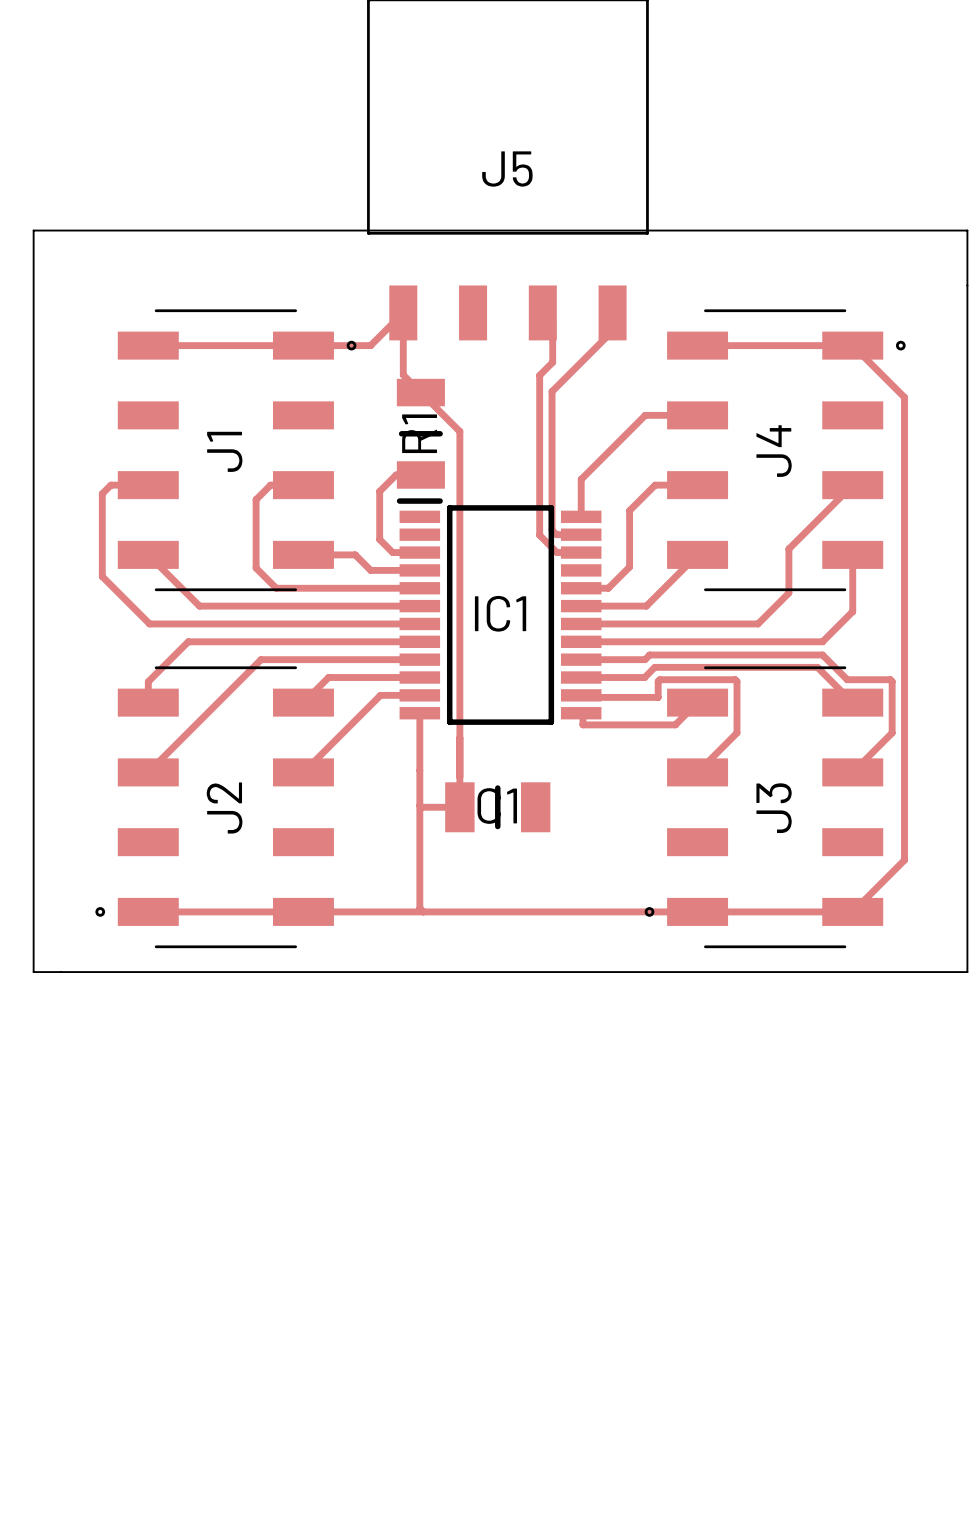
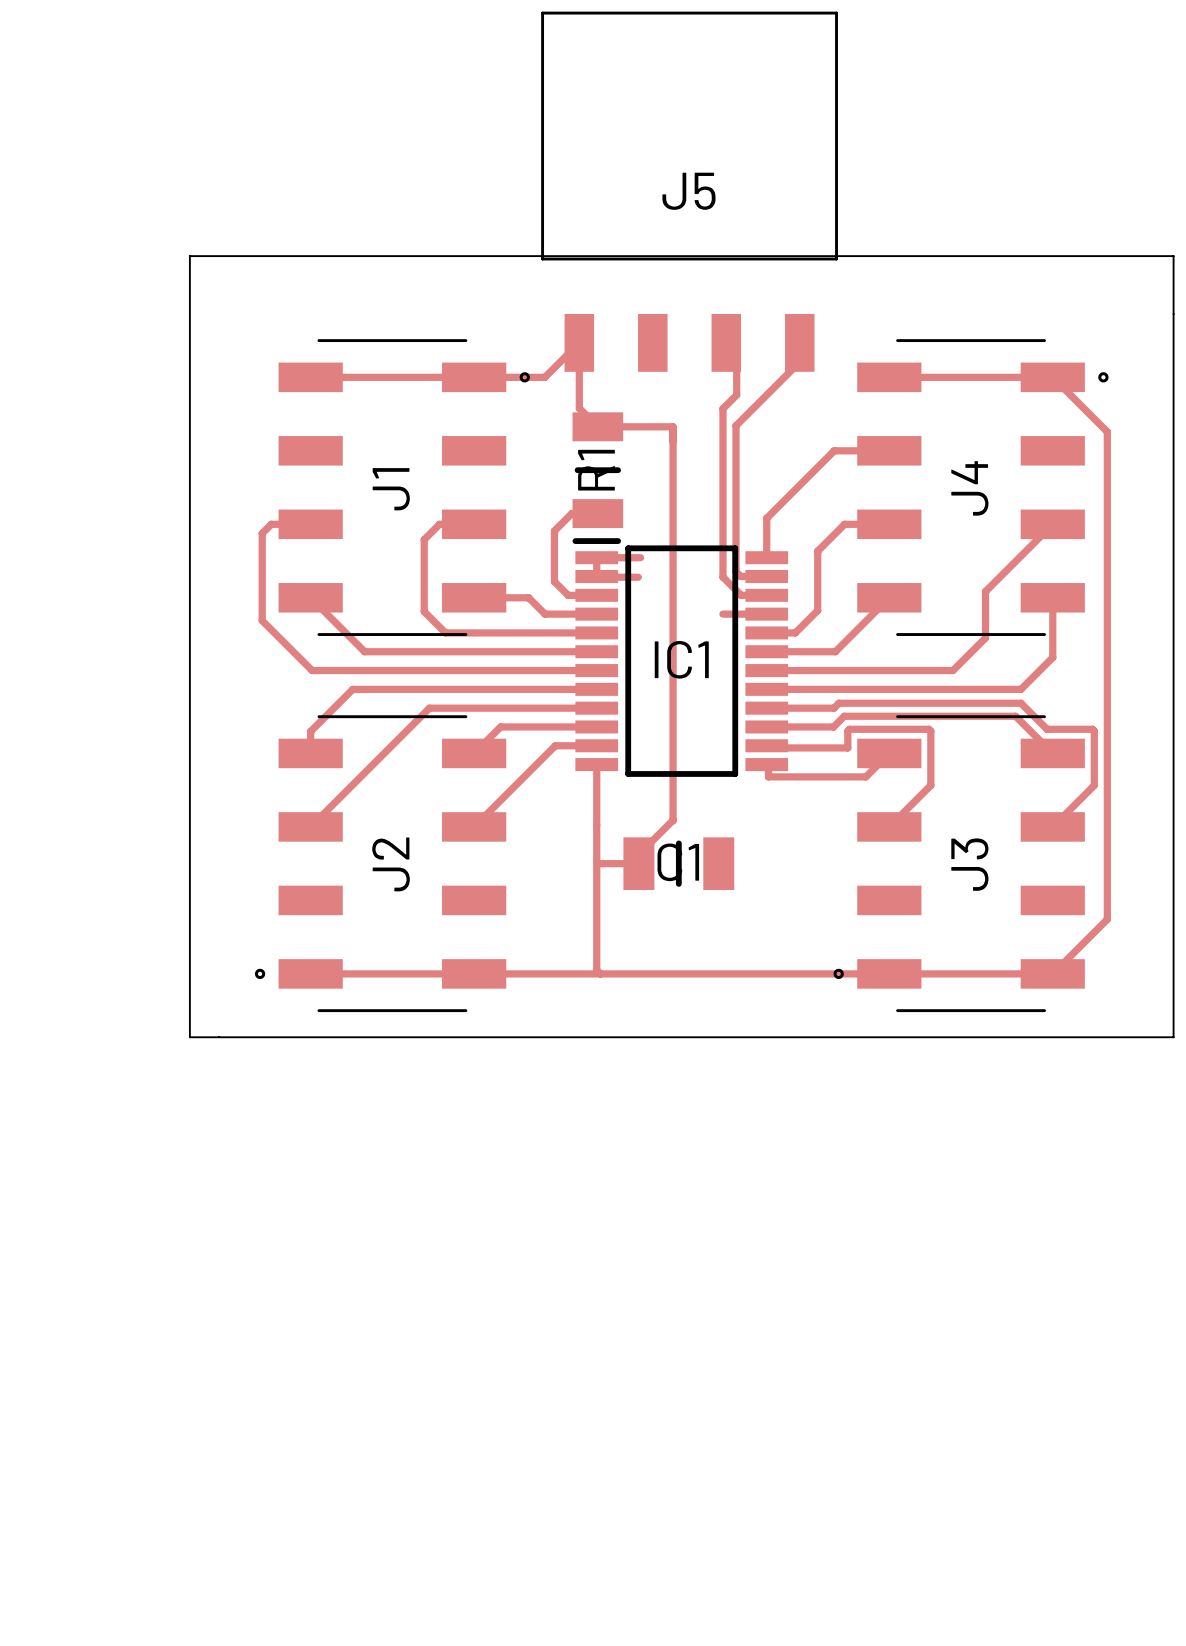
track: (420, 392) (459, 431) (459, 798) -> (597, 426) (673, 426) (673, 820)
track: none -> (640, 557) (596, 557) (596, 576) (638, 577)
track: none -> (722, 614) (766, 614)
track: none -> (673, 820) (638, 854)

